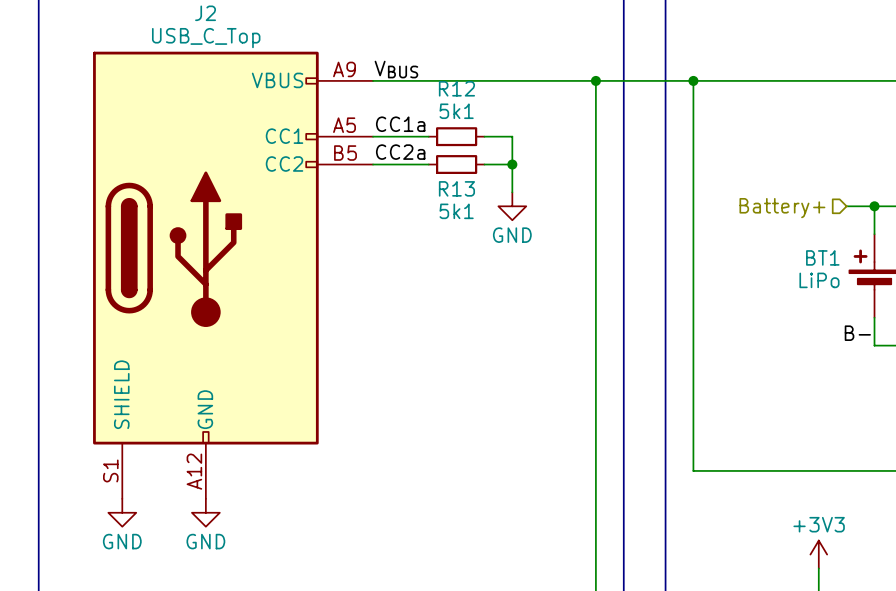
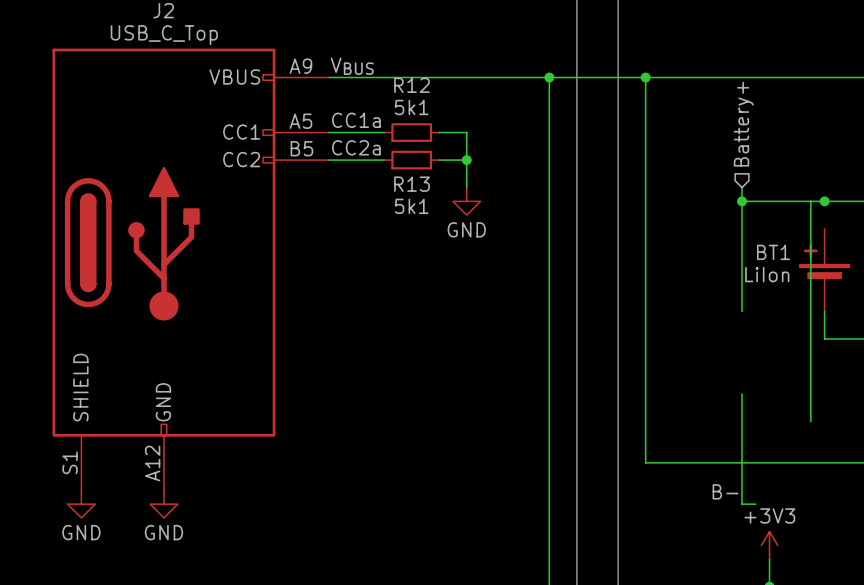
wire: none -> (742, 187) (742, 311)
wire: none -> (742, 201) (797, 201)
junction: none -> (742, 201)
wire: none -> (810, 201) (810, 421)
wire: (874, 206) (874, 234) -> none
hierarchical label rotation: 0° (782, 208) -> 90° clockwise (743, 124)
BT1 value: LiPo (819, 280) -> LiIon (767, 274)
label position: B- (857, 333) -> B- (725, 491)
wire: none -> (742, 394) (742, 504) (755, 504)

